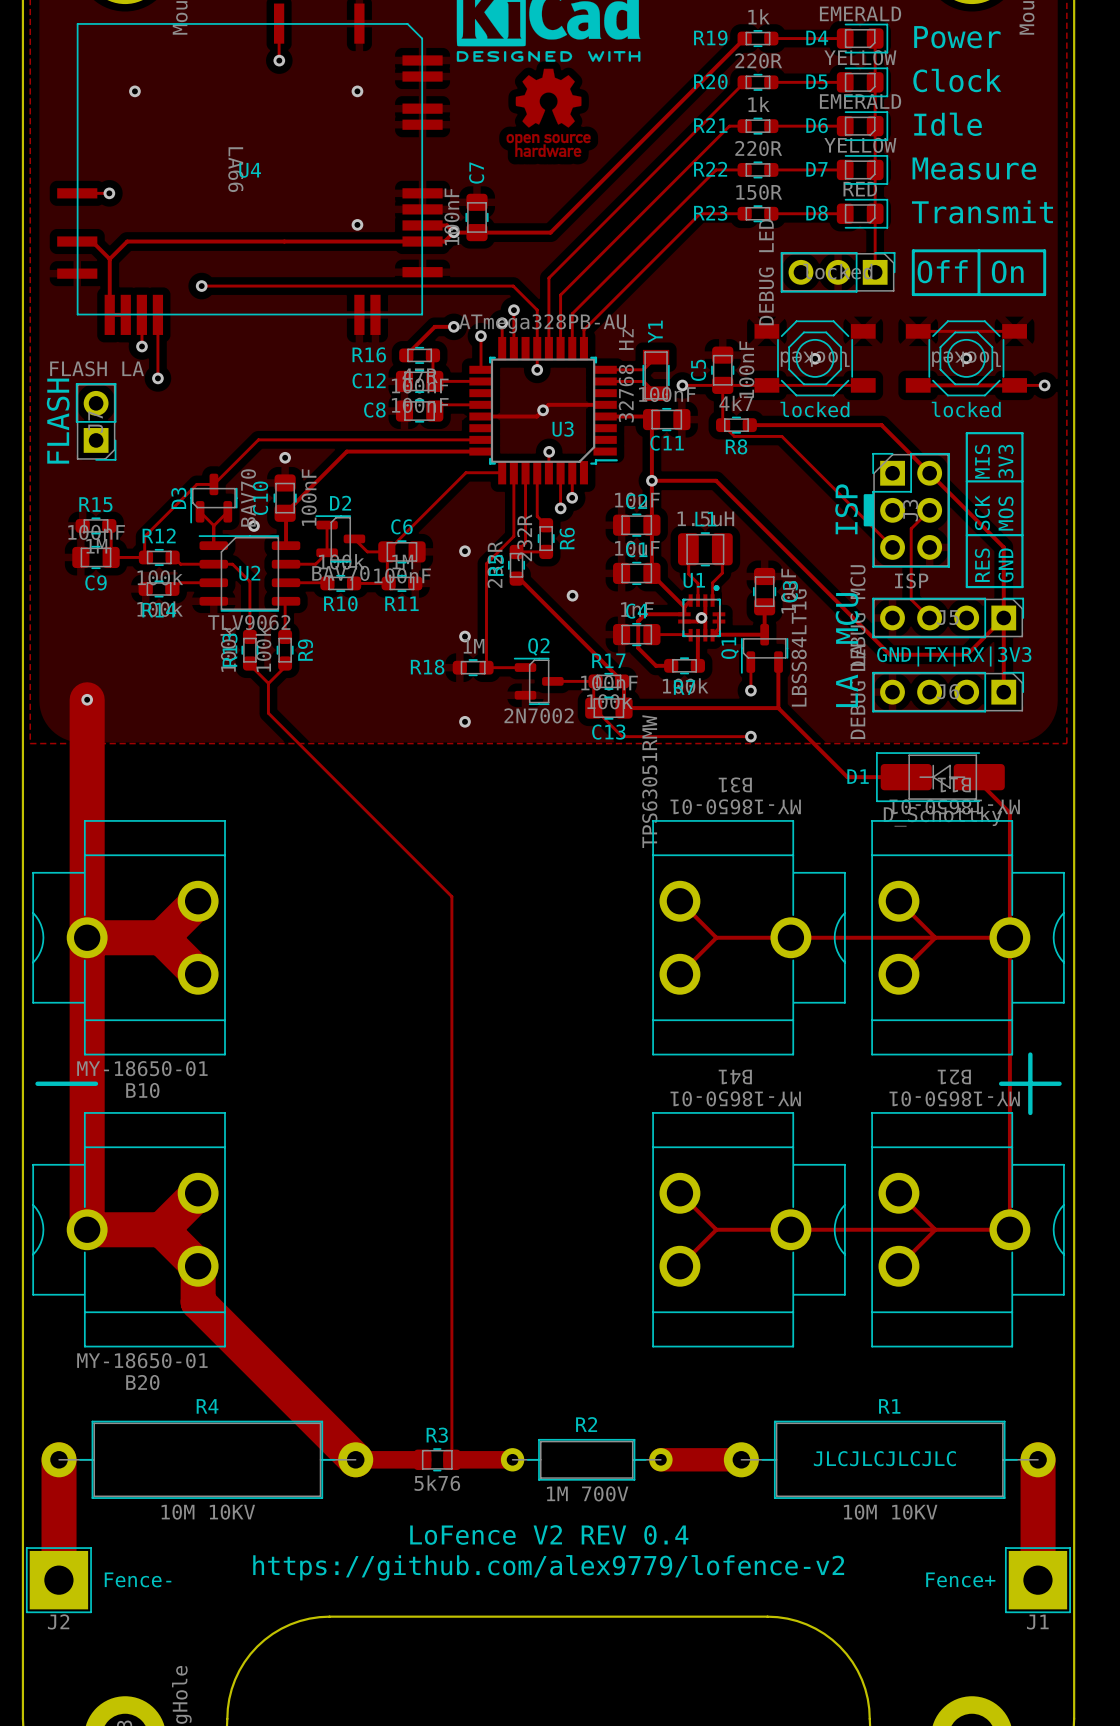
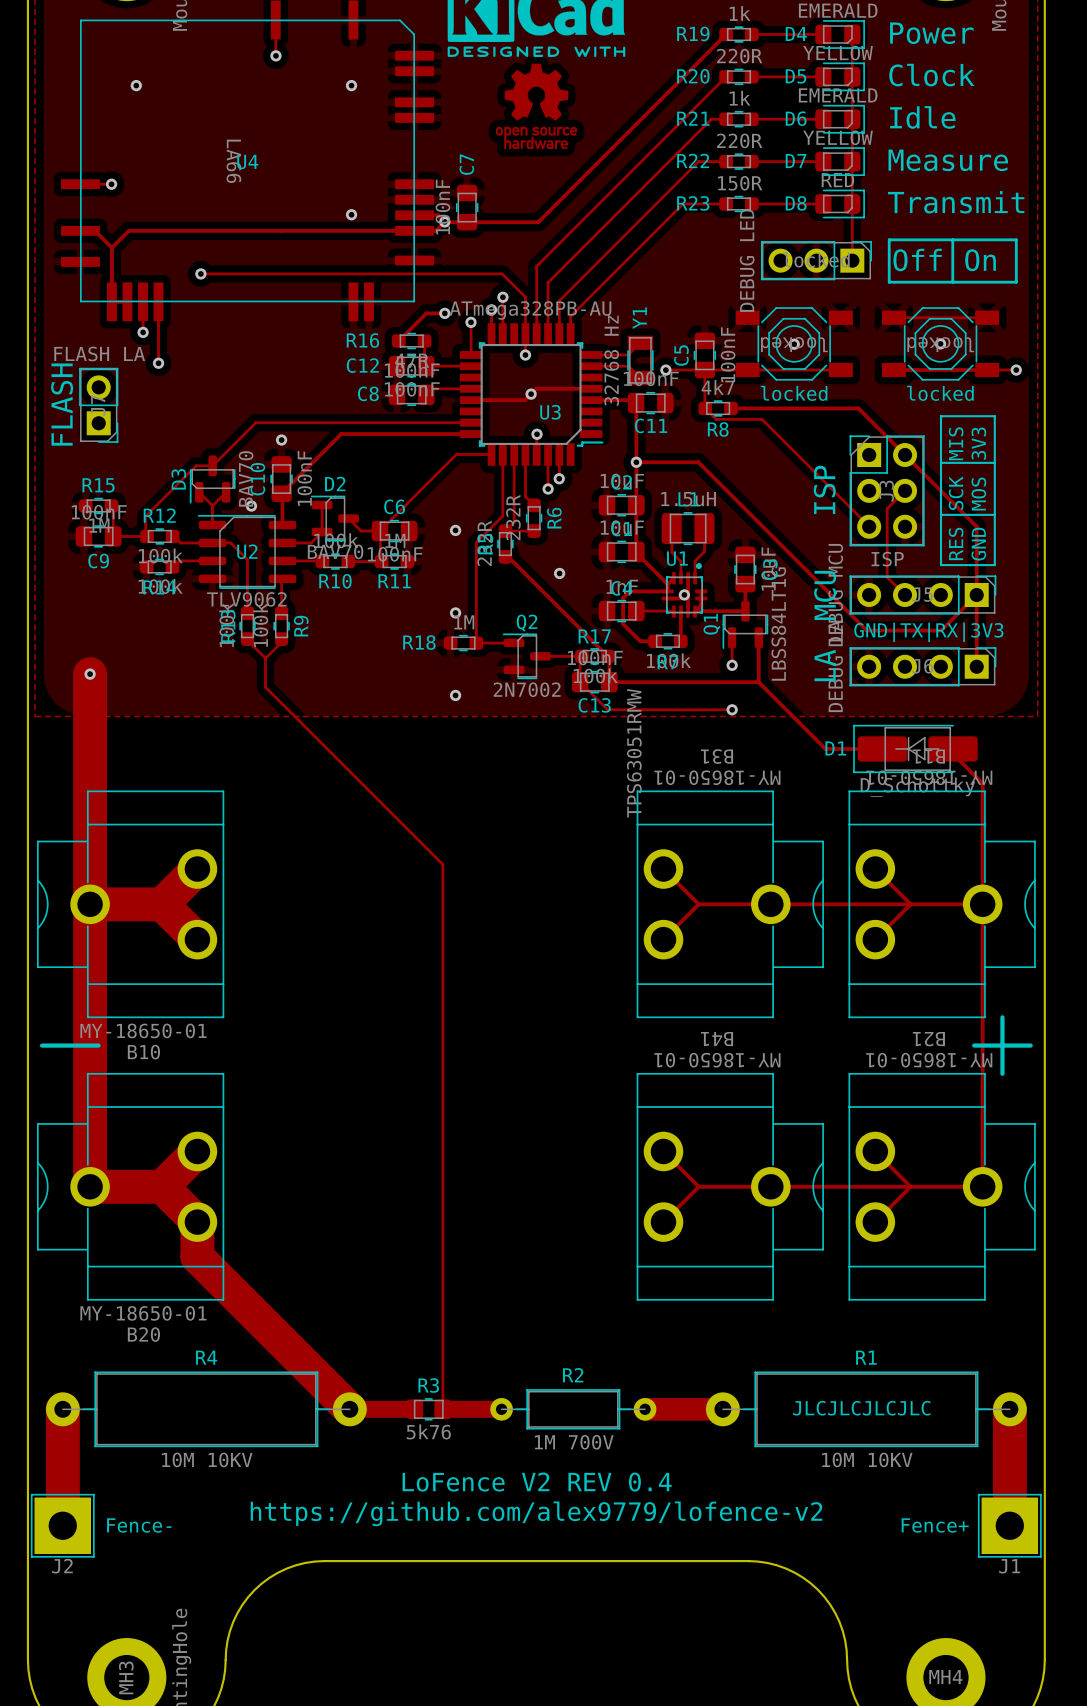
drawing: [863, 494, 875, 527] -> none

